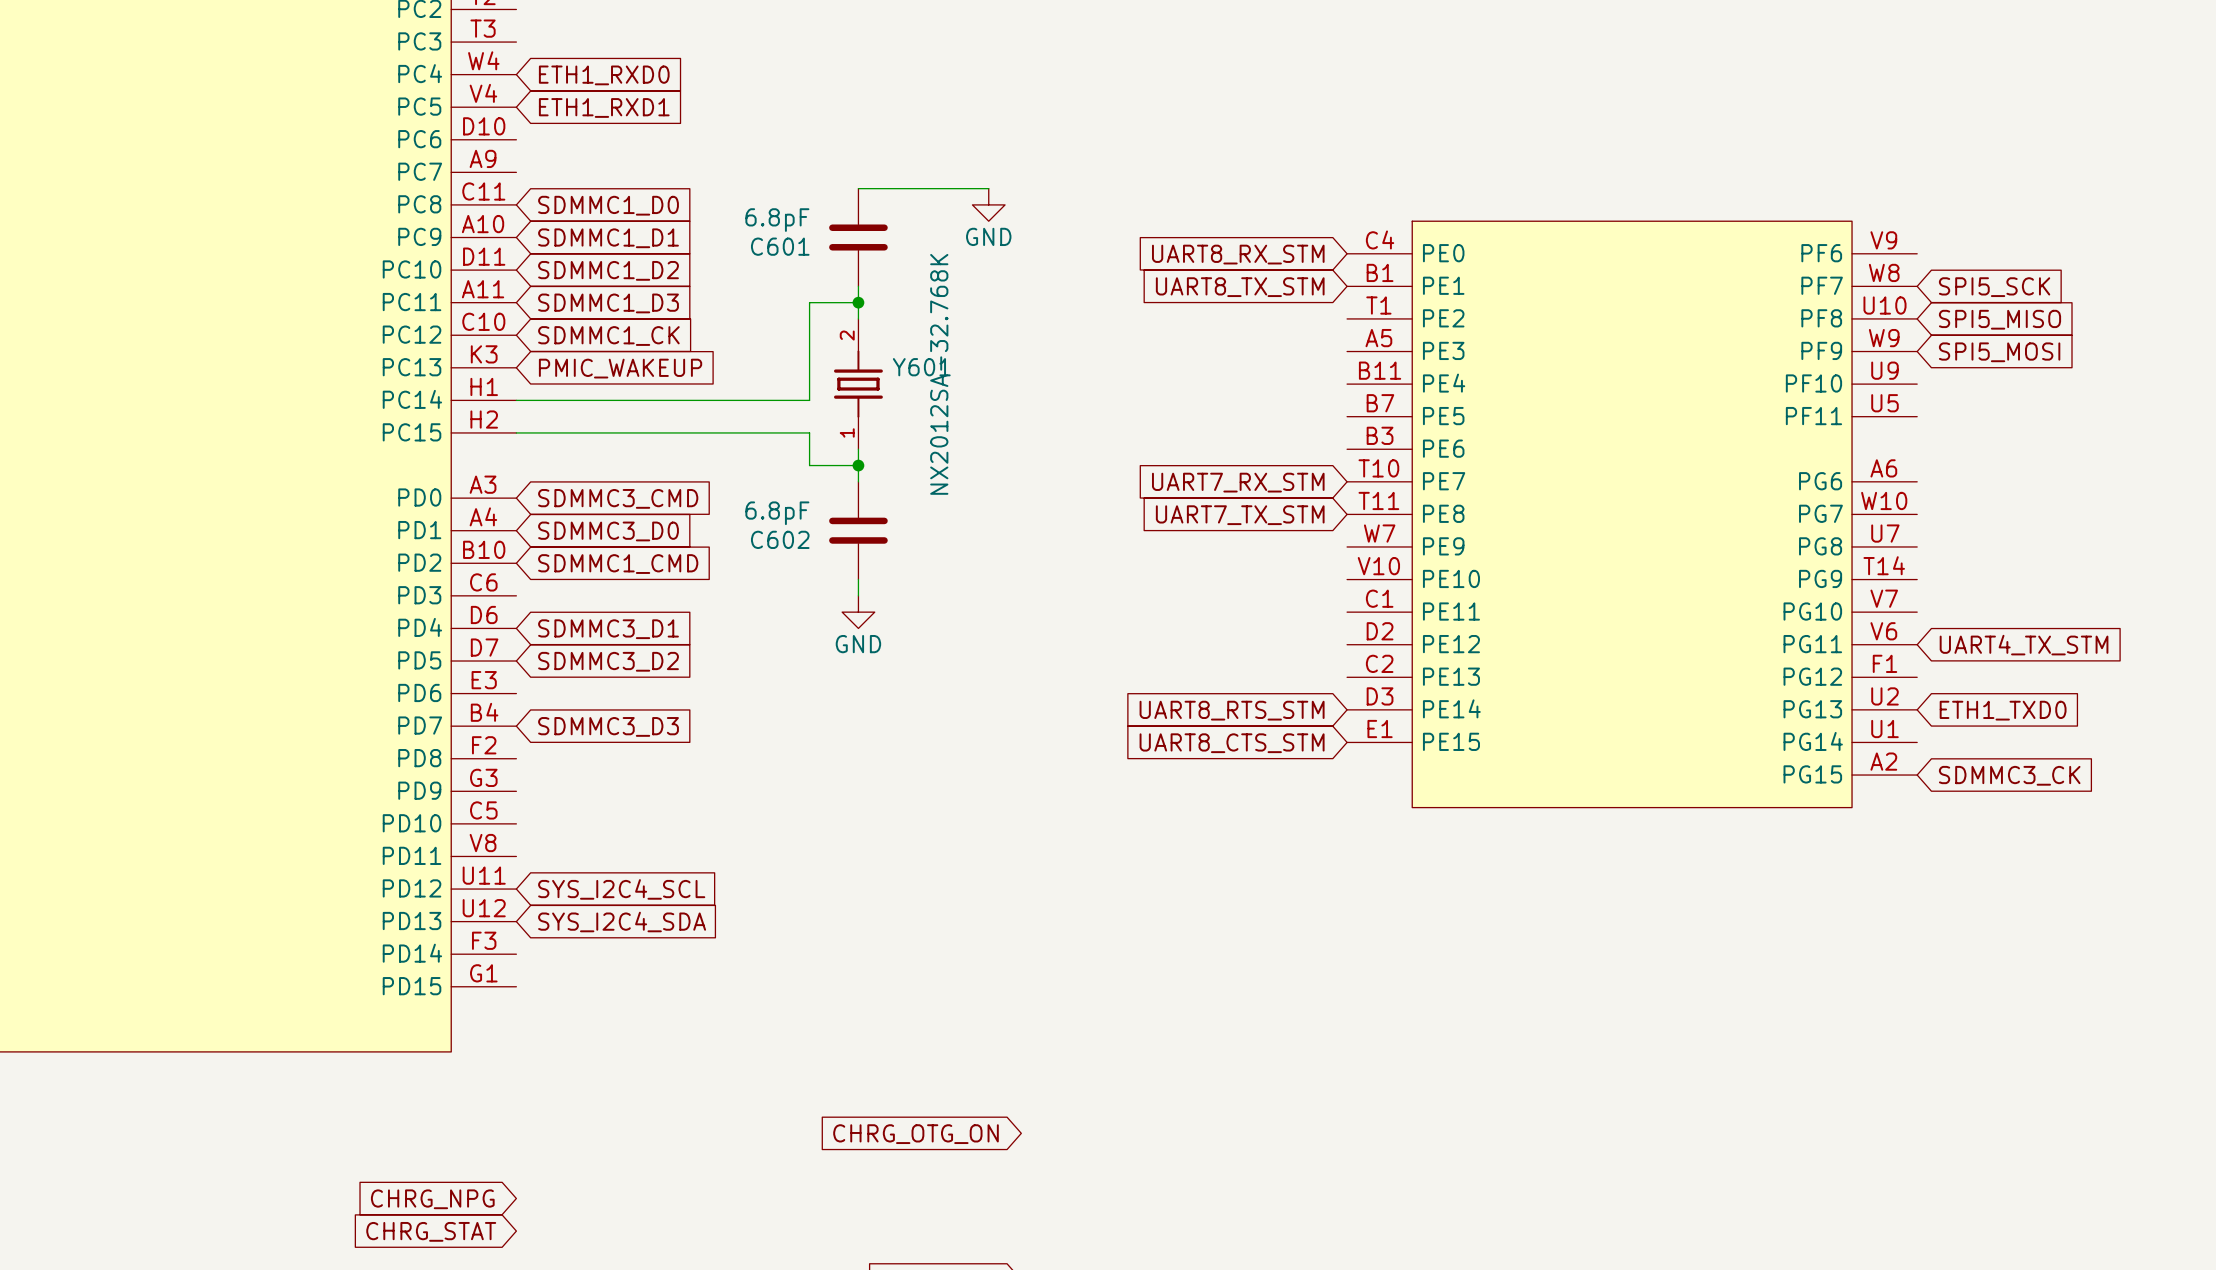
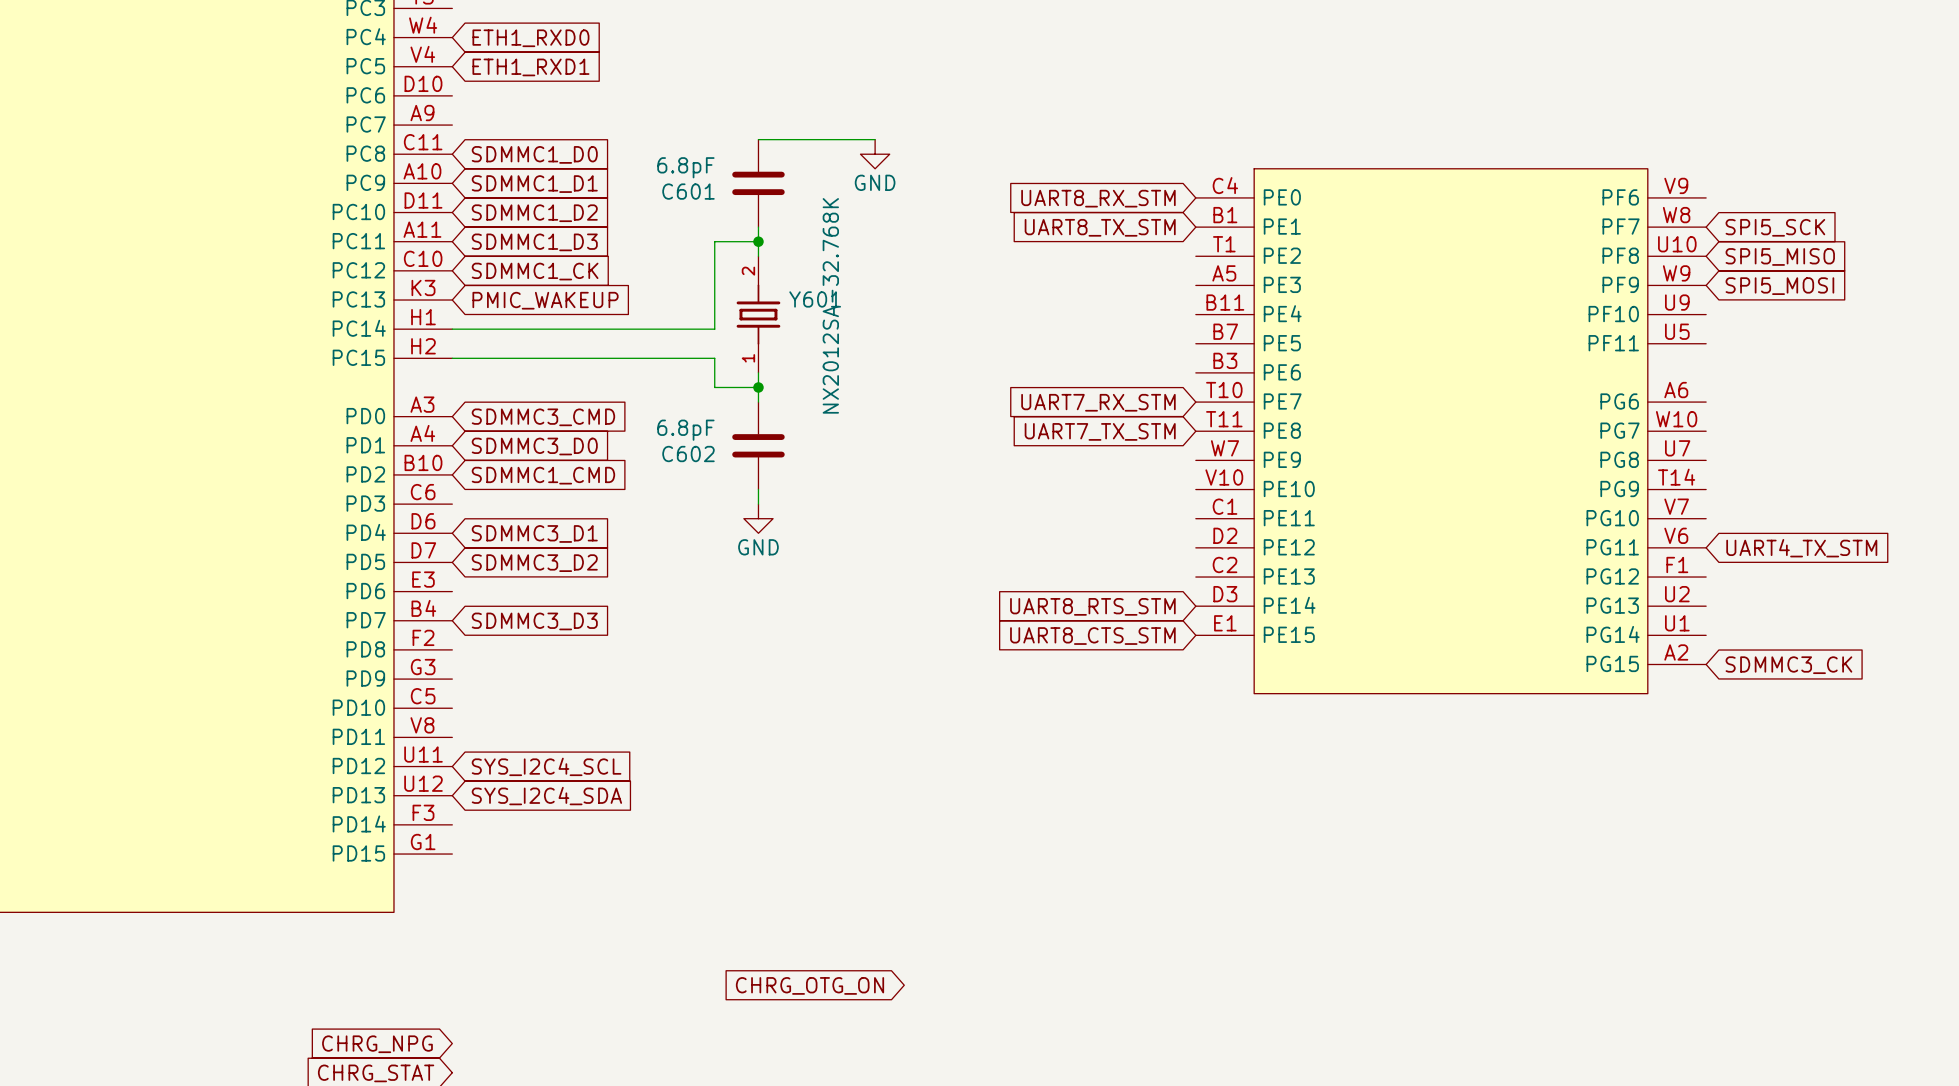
global label: ETH1_TXD0 (2003, 710) -> none

